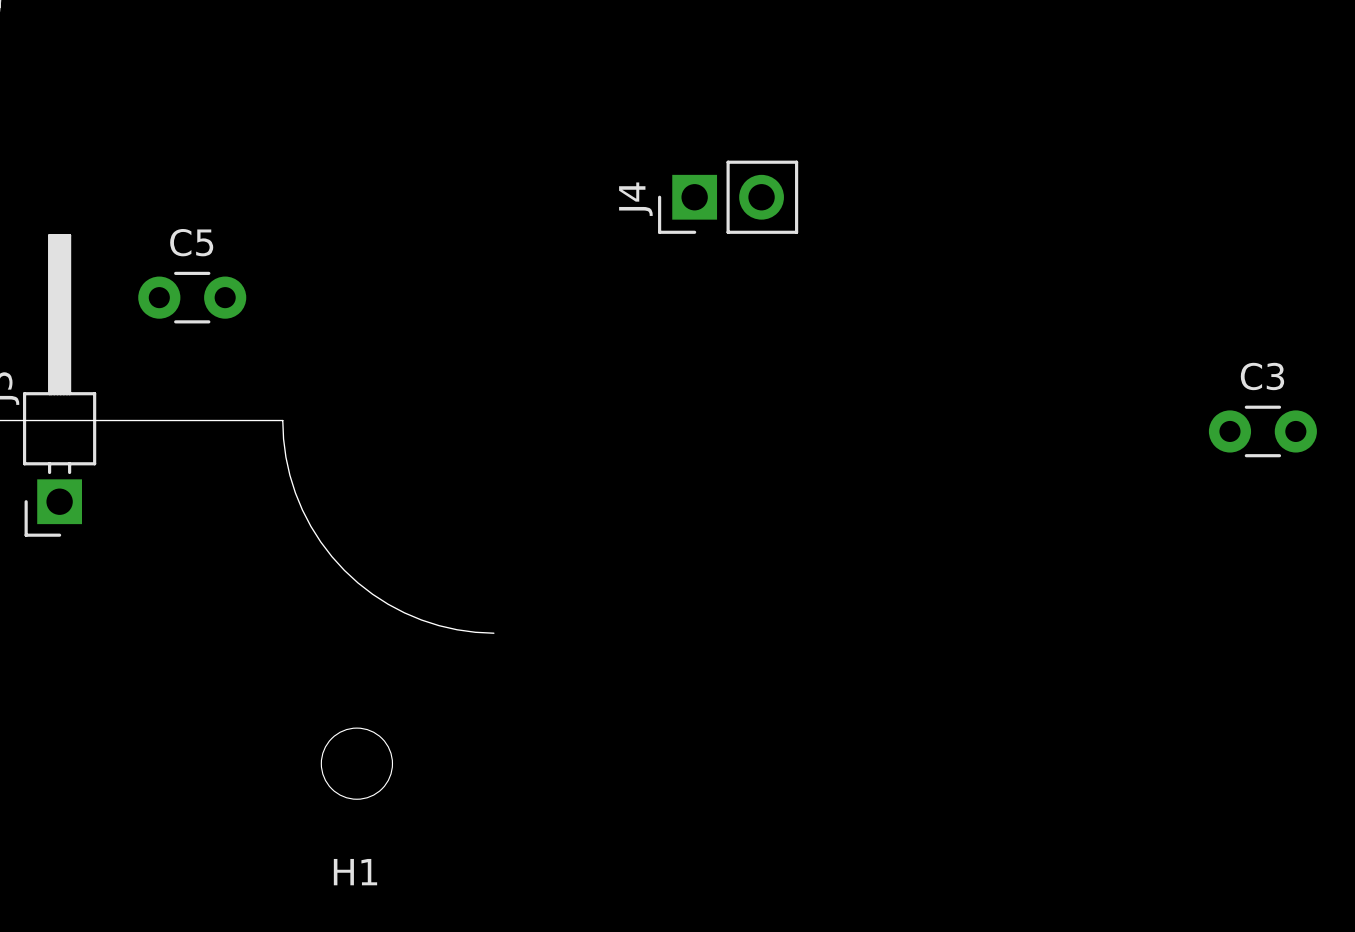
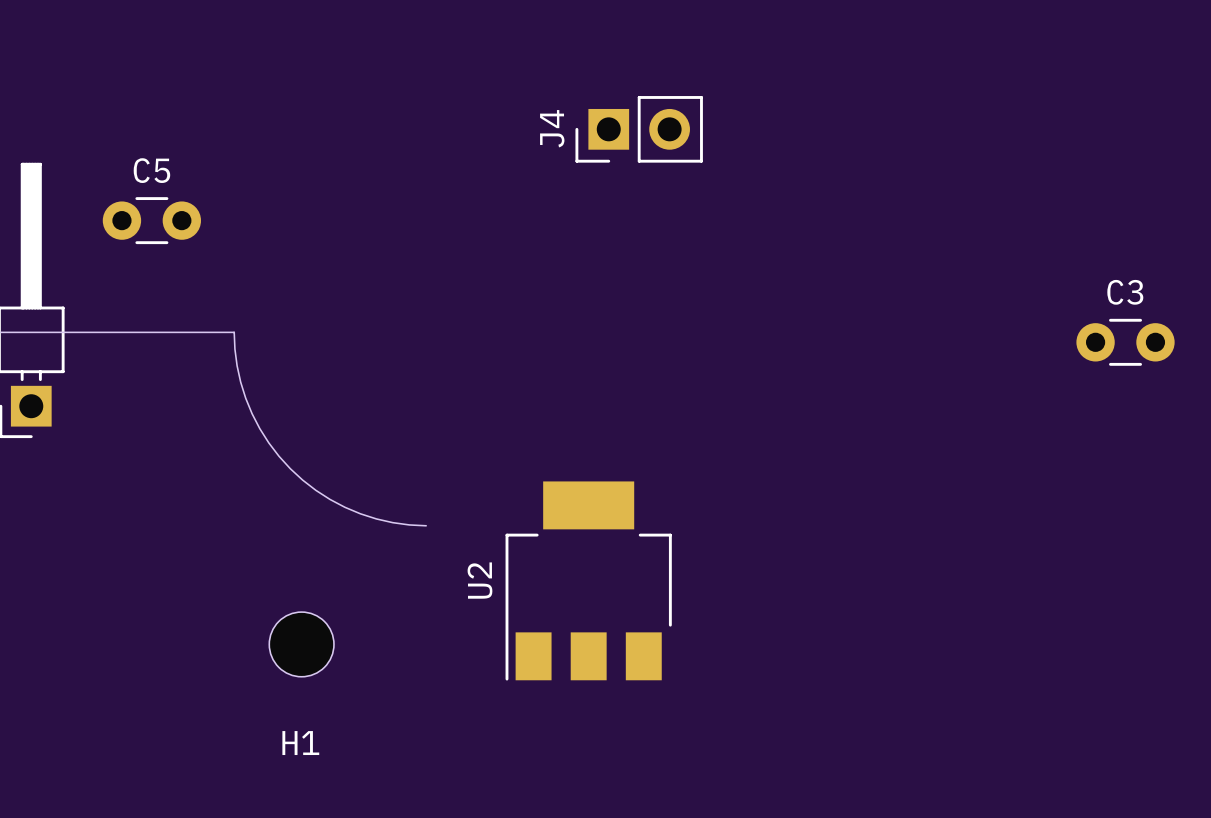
U2: none -> (588, 580)

